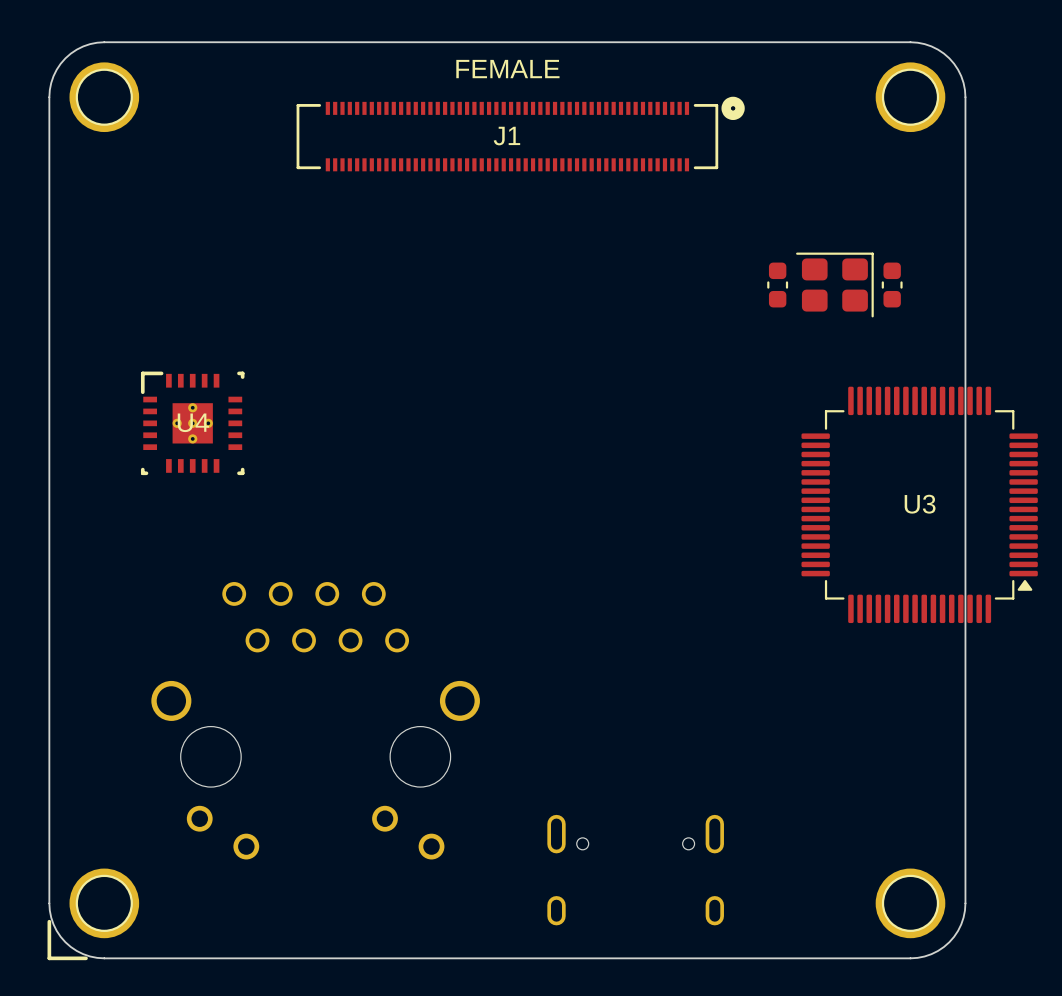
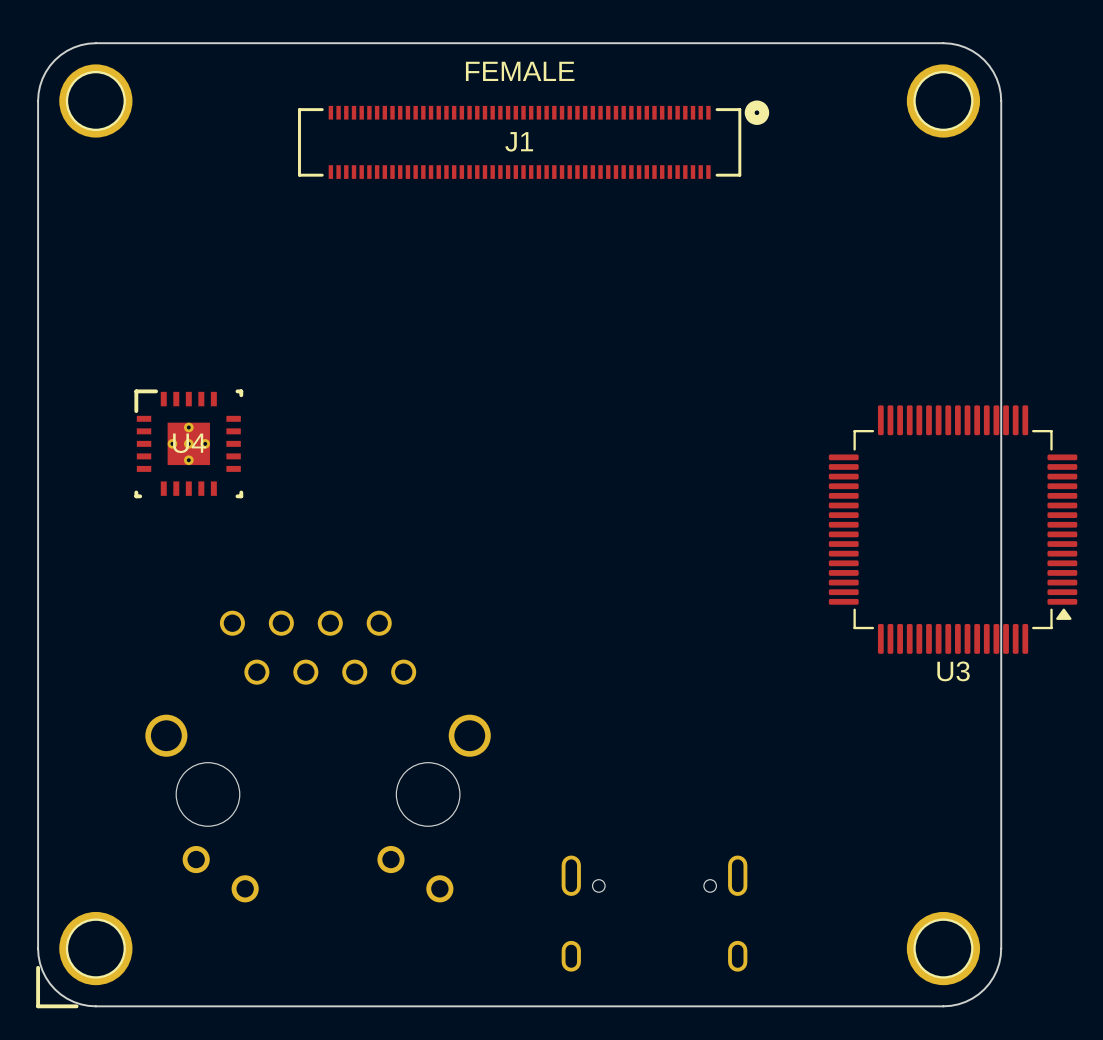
part: (777, 285) -> none
part: (834, 285) -> none
part: (892, 285) -> none
U3 name position: U3 (920, 504) -> U3 (953, 671)

